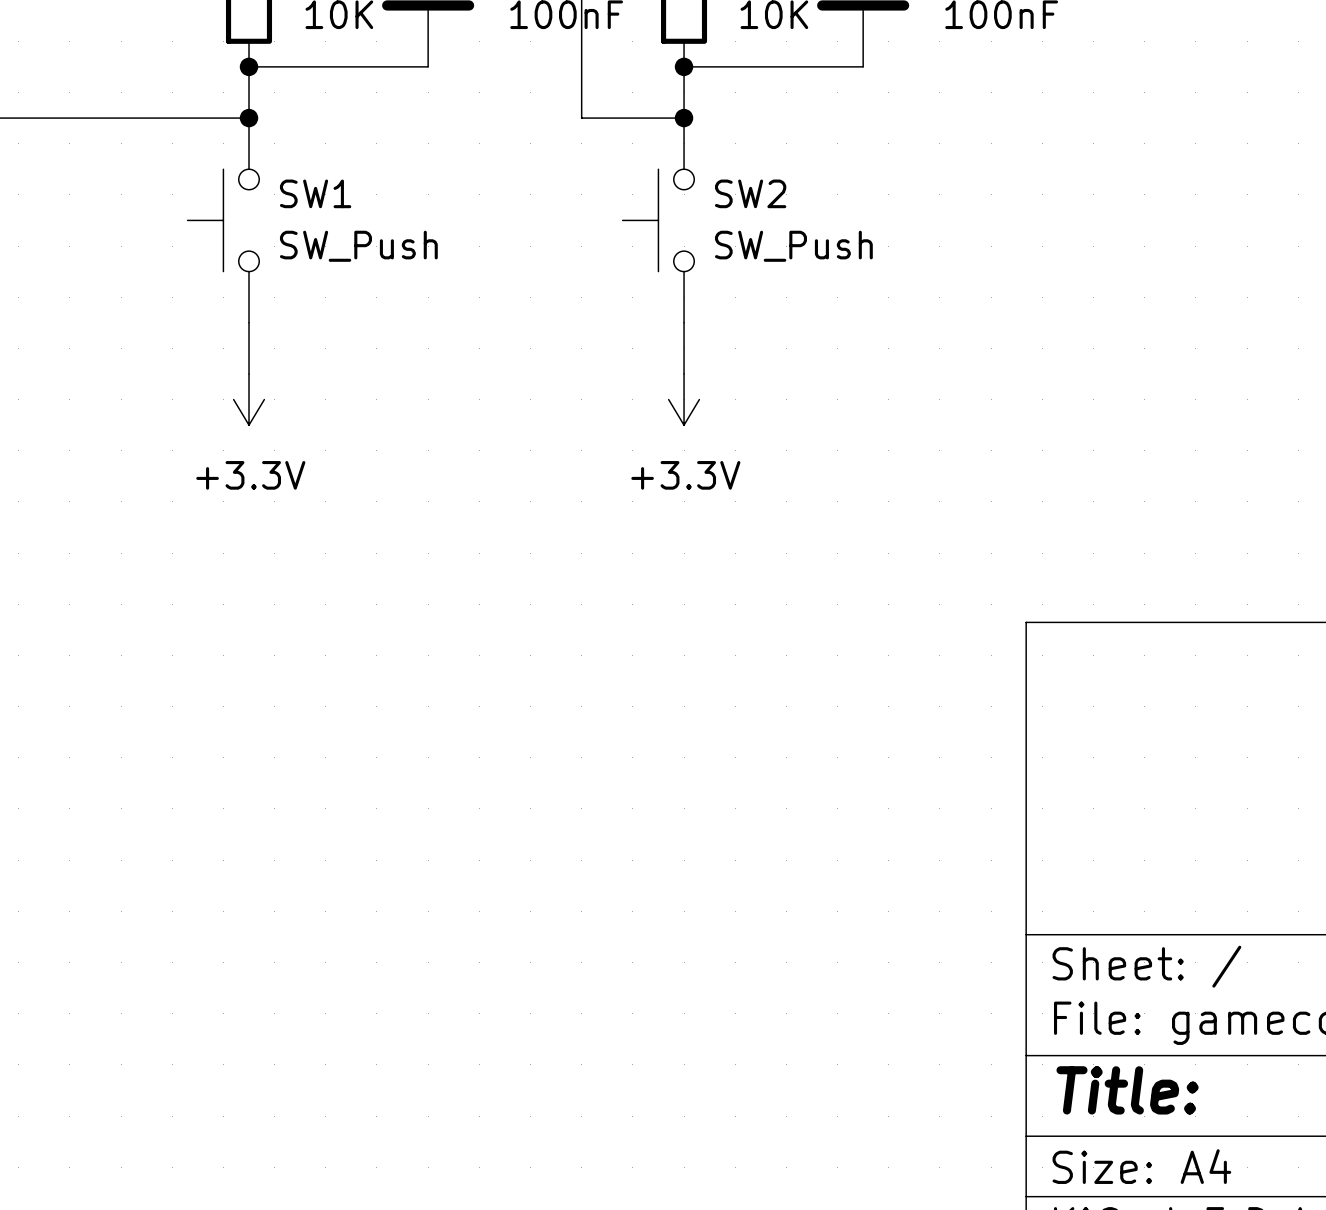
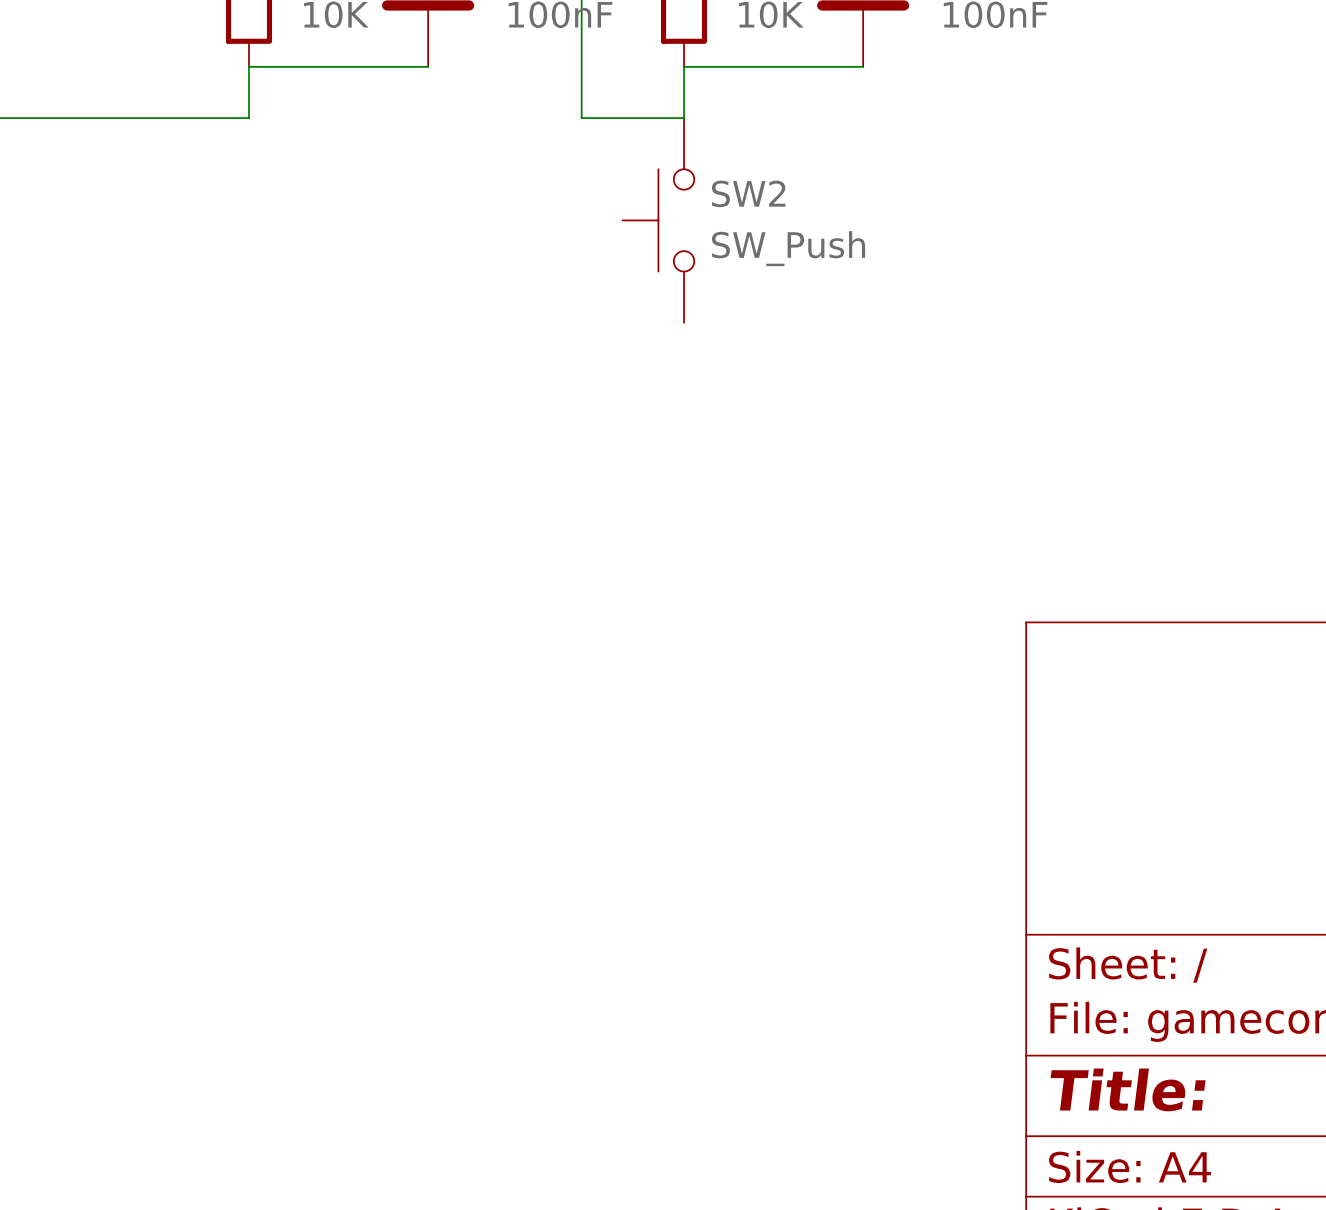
junction: (249, 66) -> none
junction: (684, 66) -> none
junction: (249, 118) -> none
junction: (684, 118) -> none
SW1: SW_Push (223, 220) -> none
wire: (249, 322) (249, 373) -> none
wire: (684, 322) (684, 373) -> none
power symbol: +3.3V (249, 399) -> none
power symbol: +3.3V (684, 399) -> none

